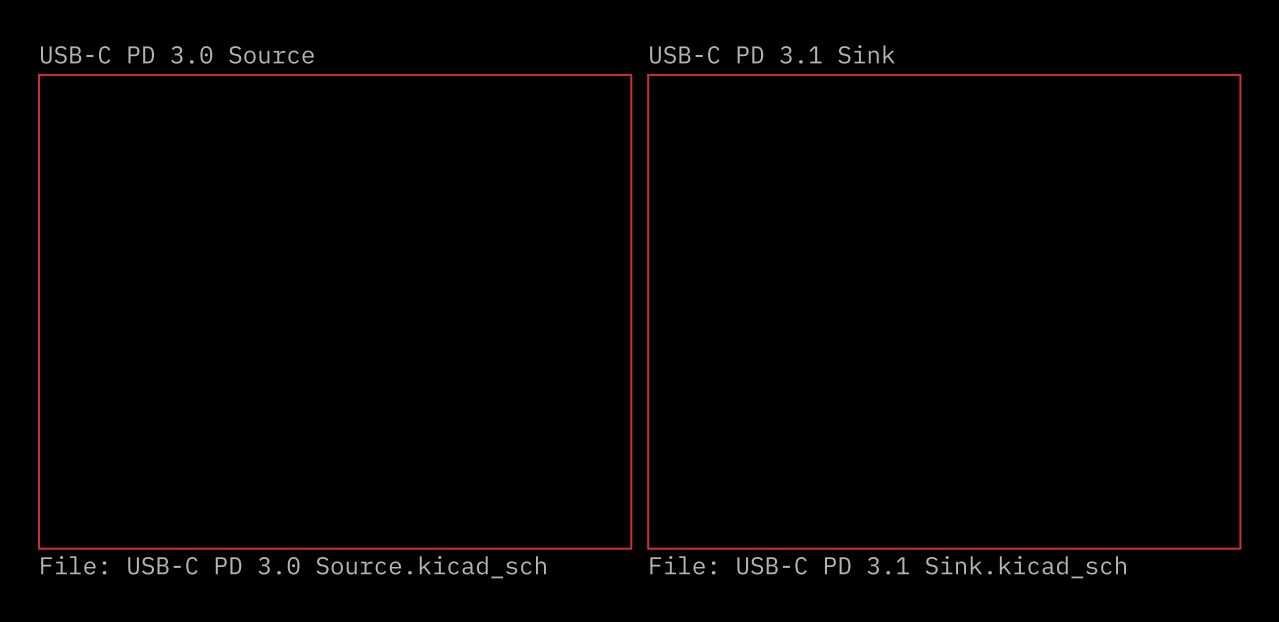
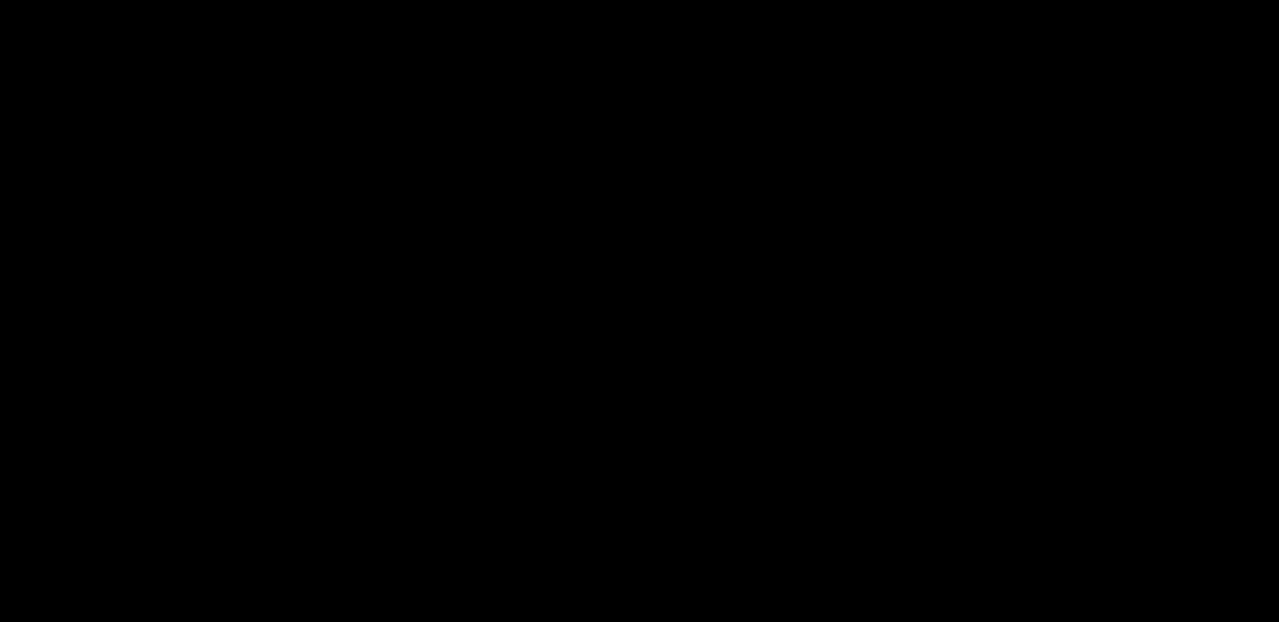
sheet USB-C PD 3.0 Source: File: USB-C PD 3.0 Source.kicad_sch (335, 311) -> none
sheet USB-C PD 3.1 Sink: File: USB-C PD 3.1 Sink.kicad_sch (944, 311) -> none

